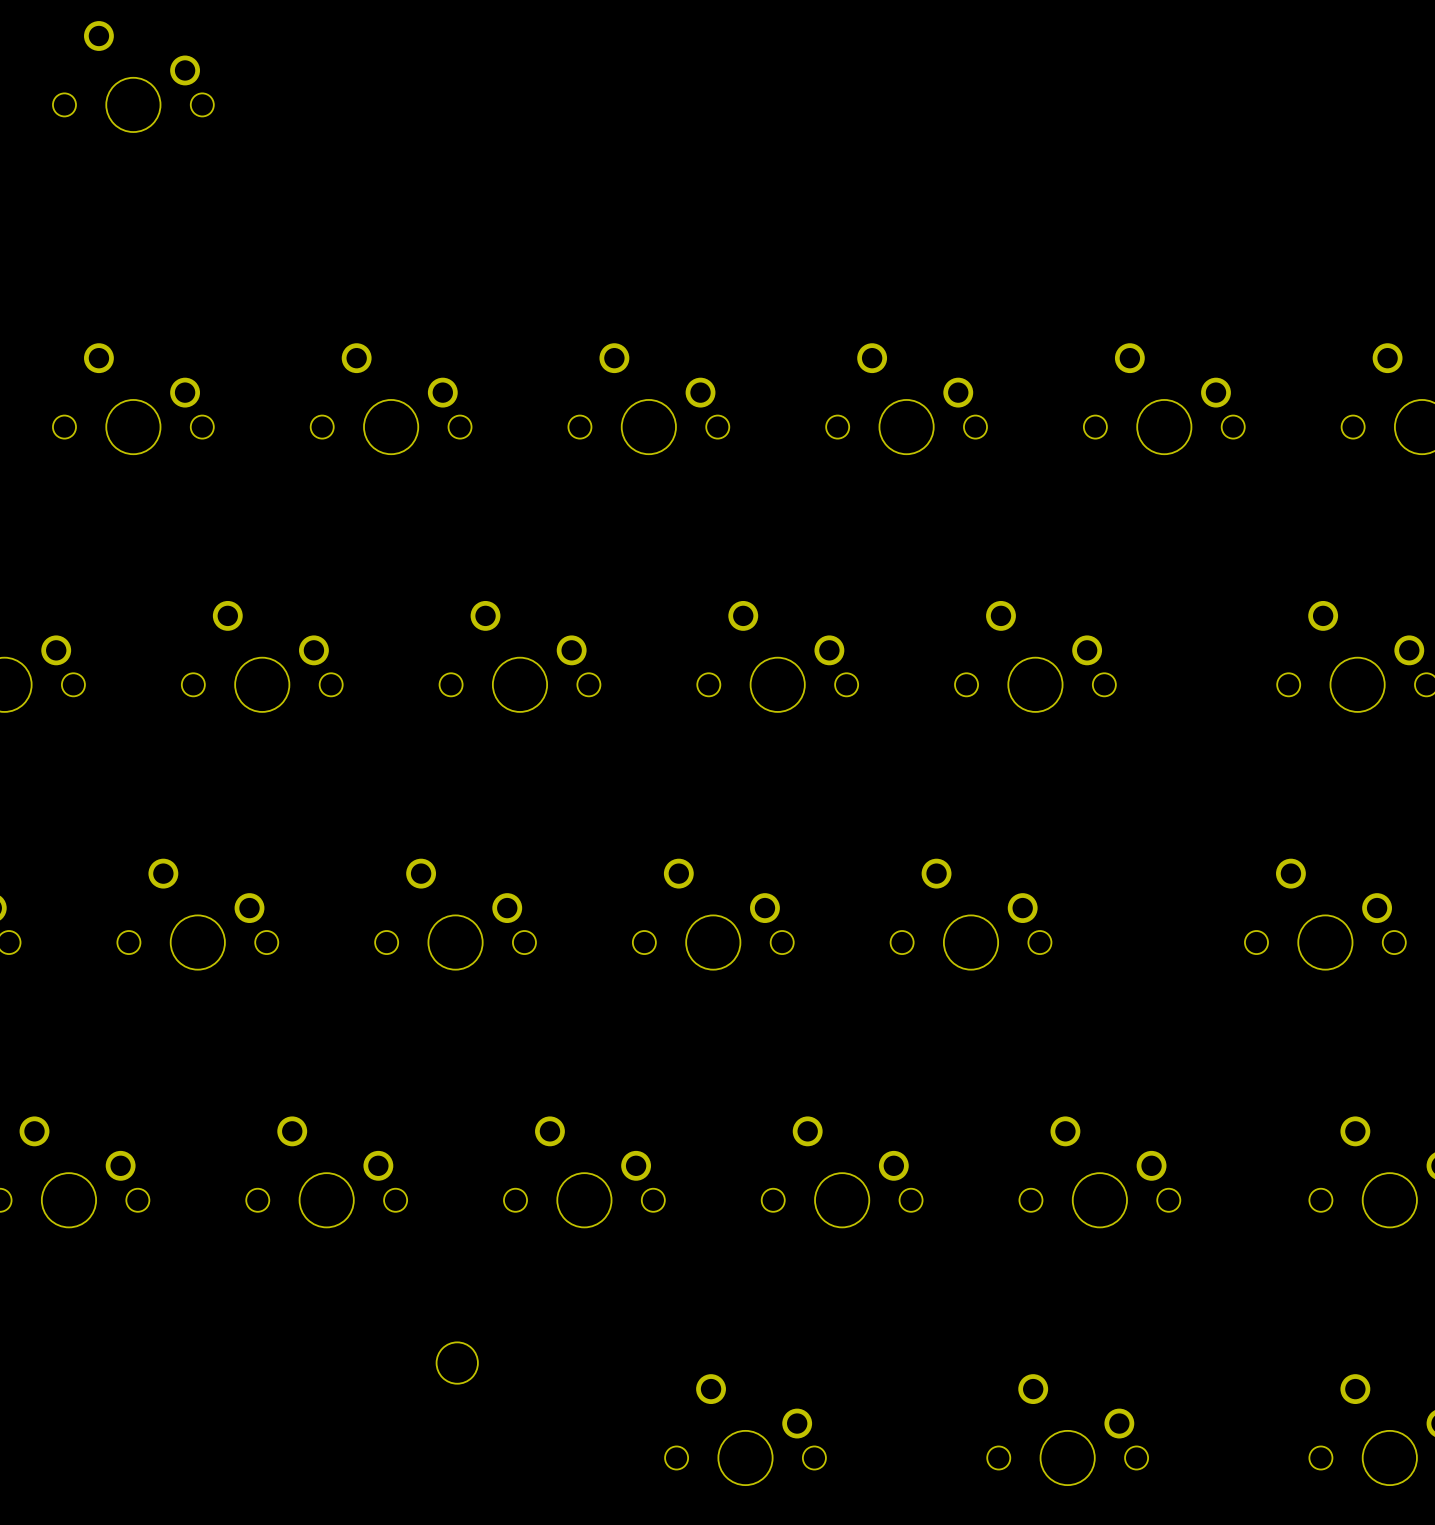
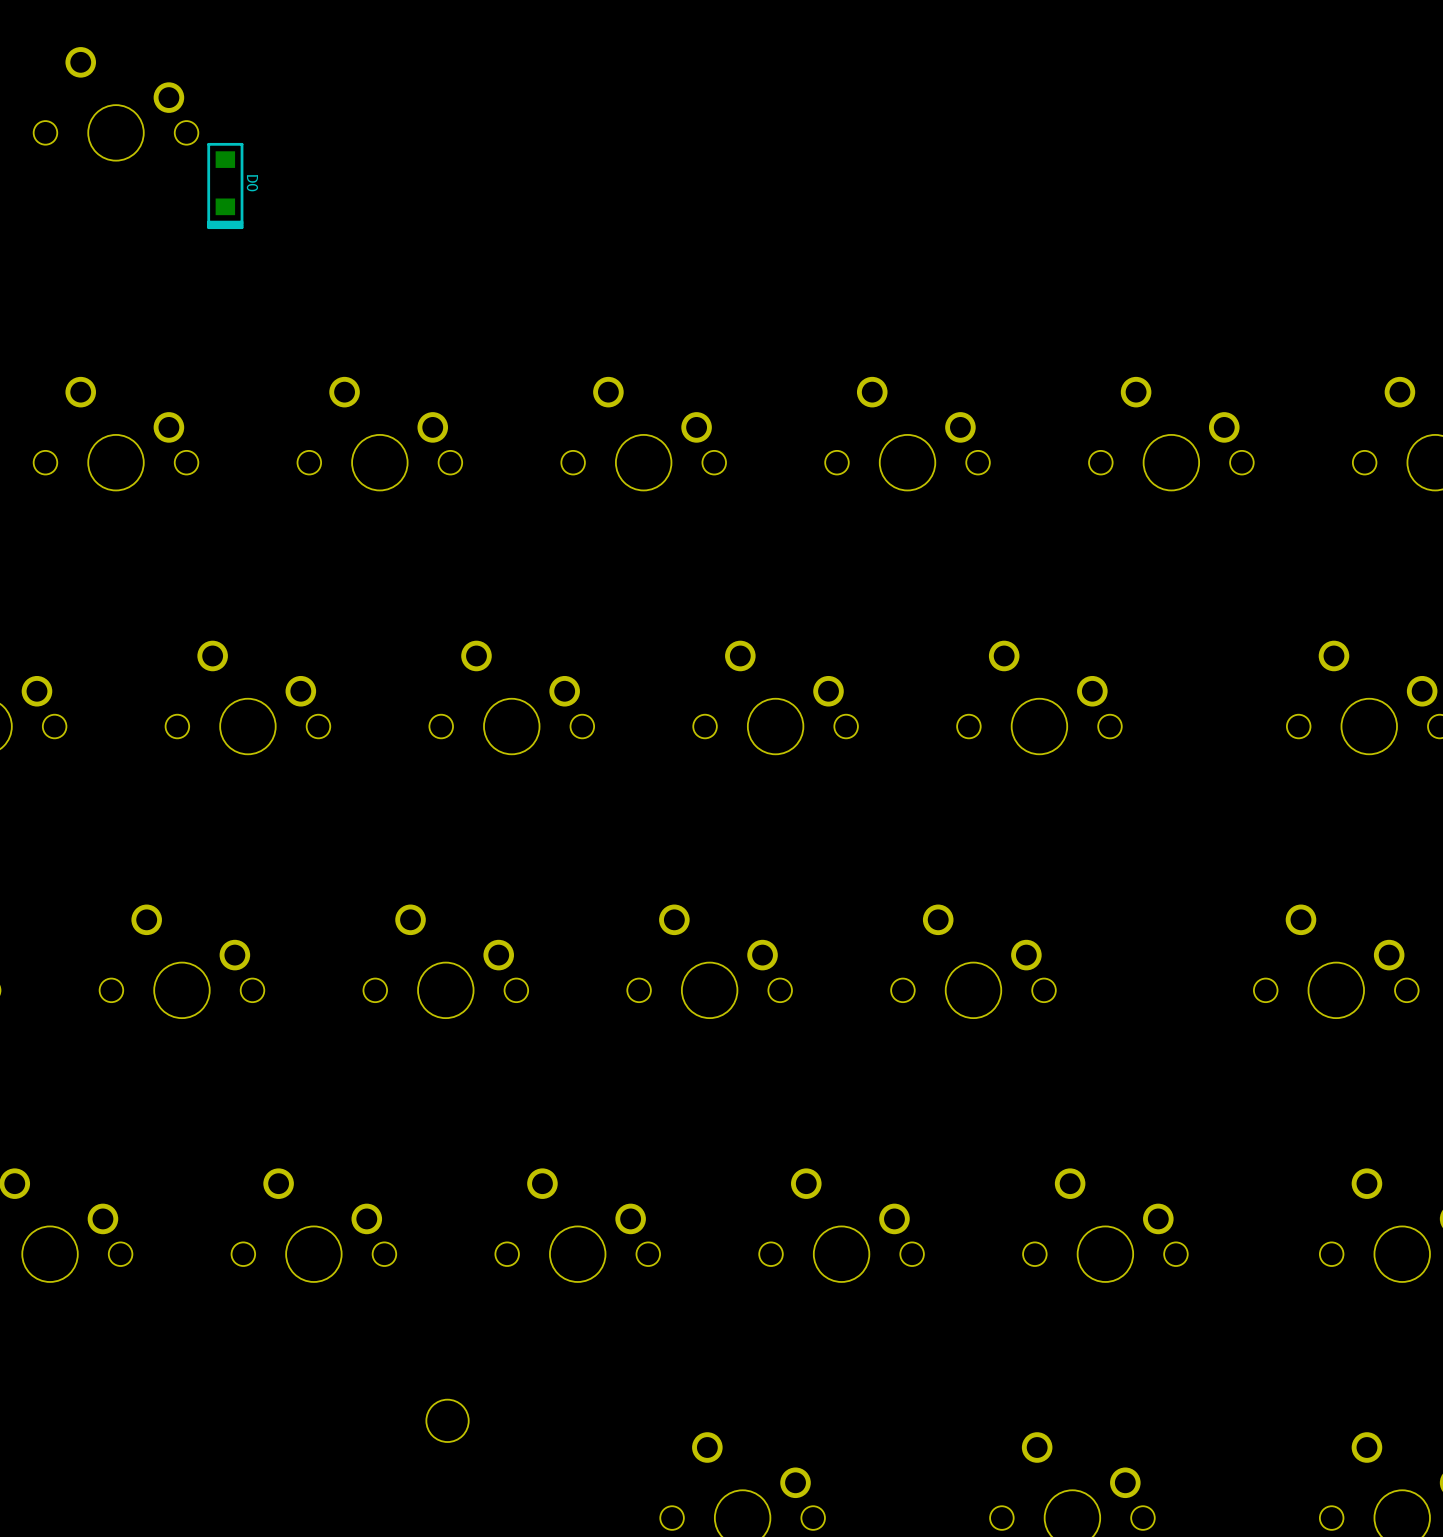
D0: none -> (225, 185)

